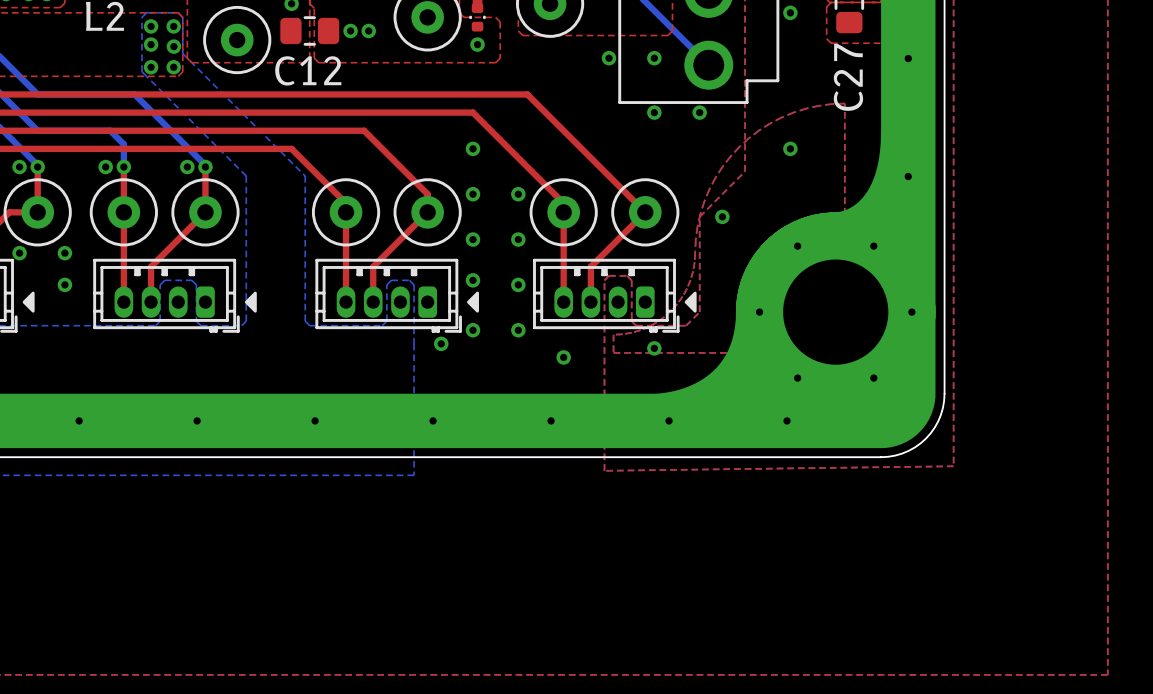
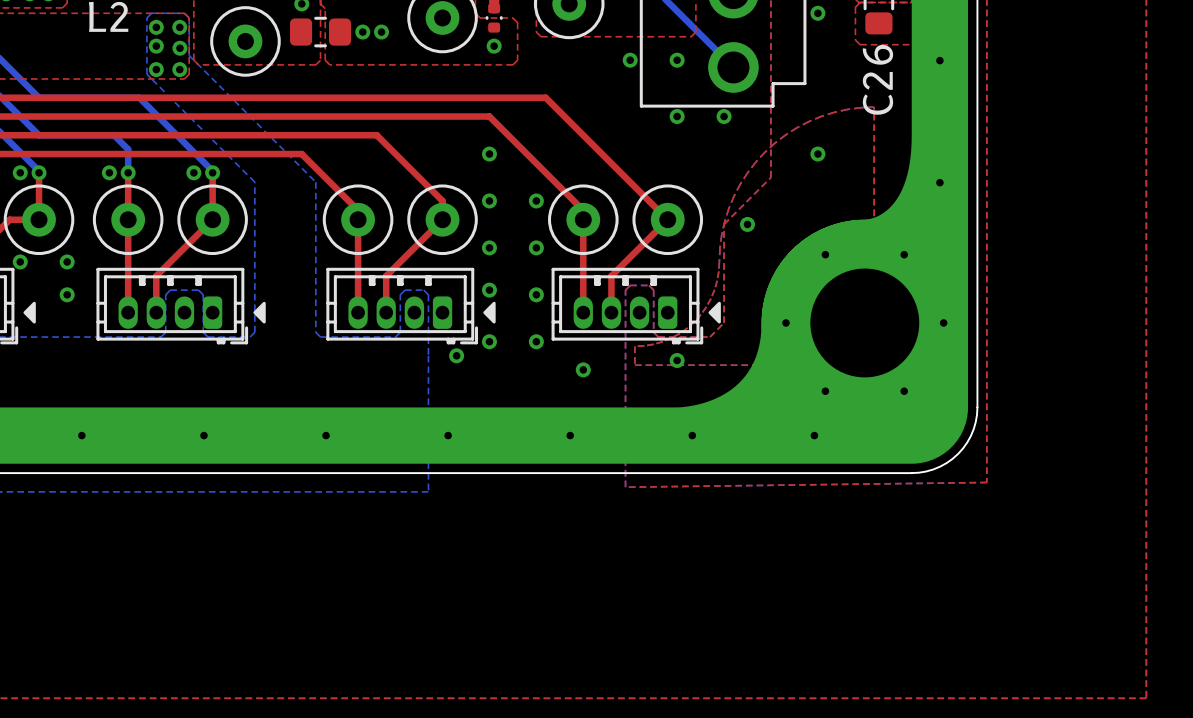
C12 name: C12 (308, 70) -> none
C27 name: C27 (848, 77) -> C26 (877, 79)

